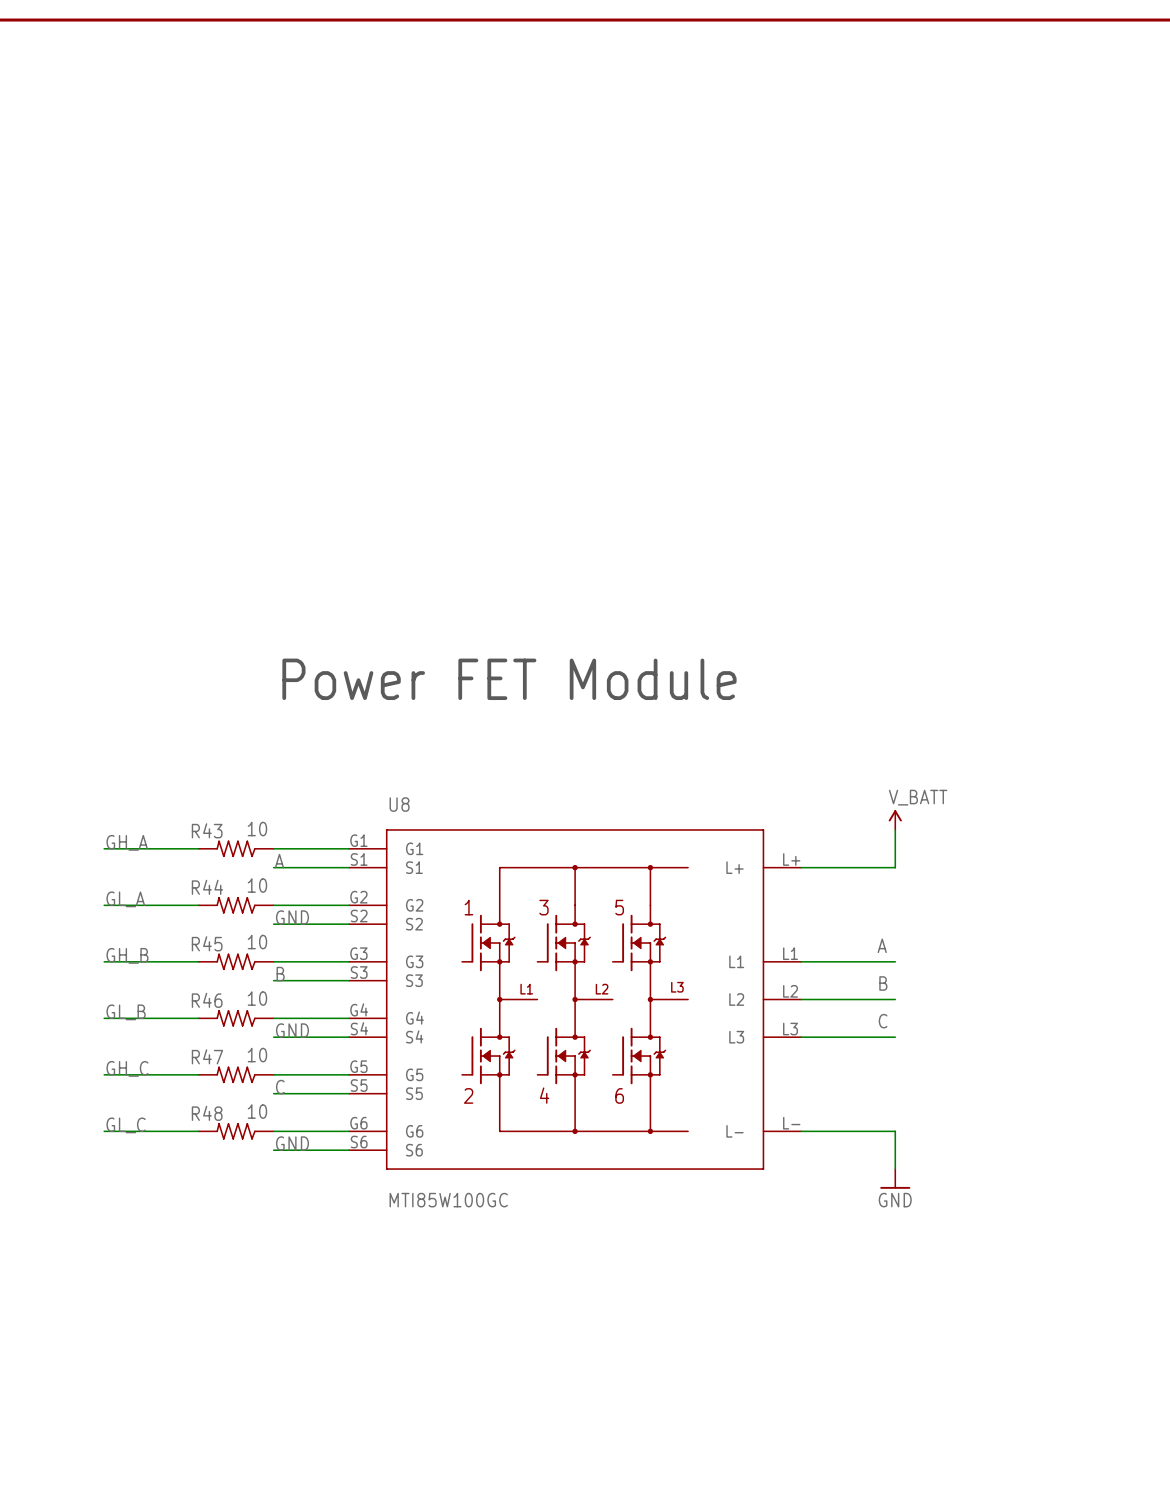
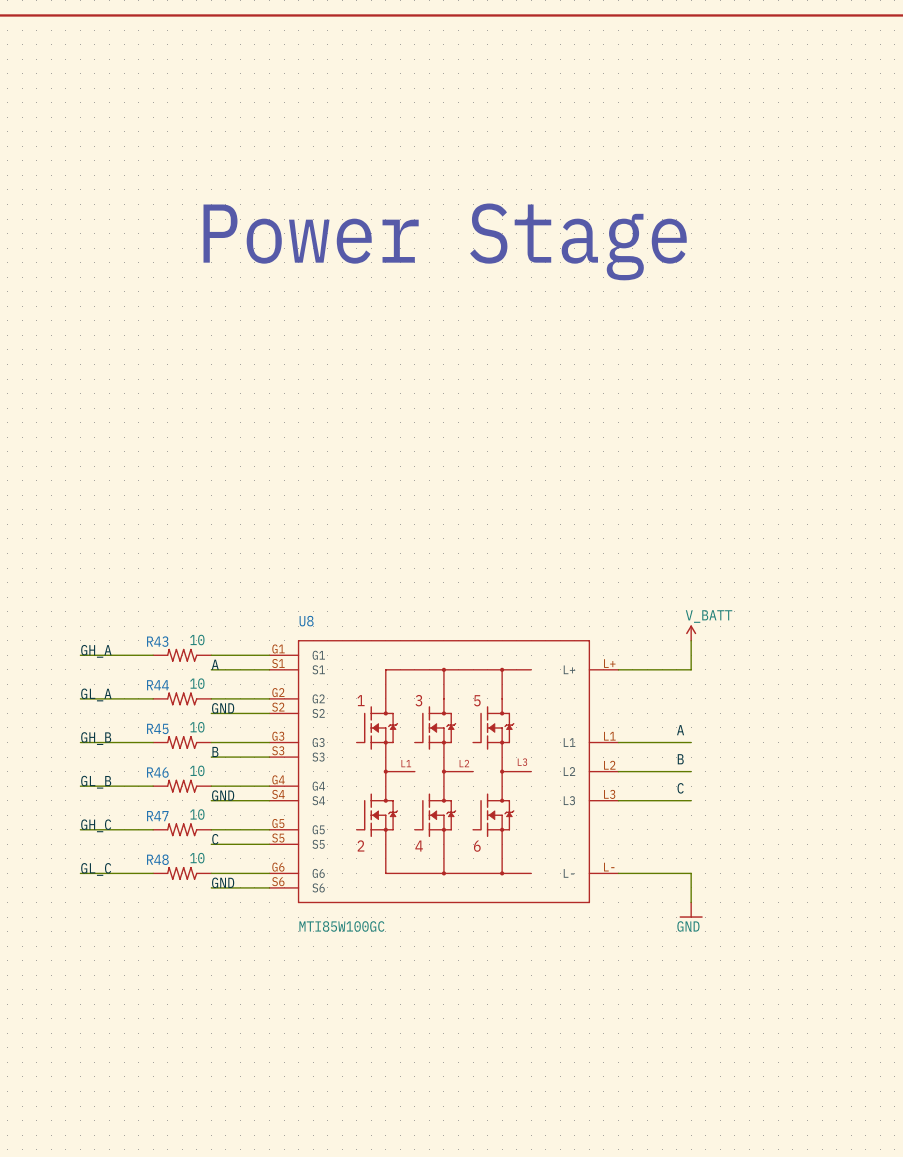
text: none -> Power Stage (445, 241)
text: Power FET Module (509, 679) -> none

